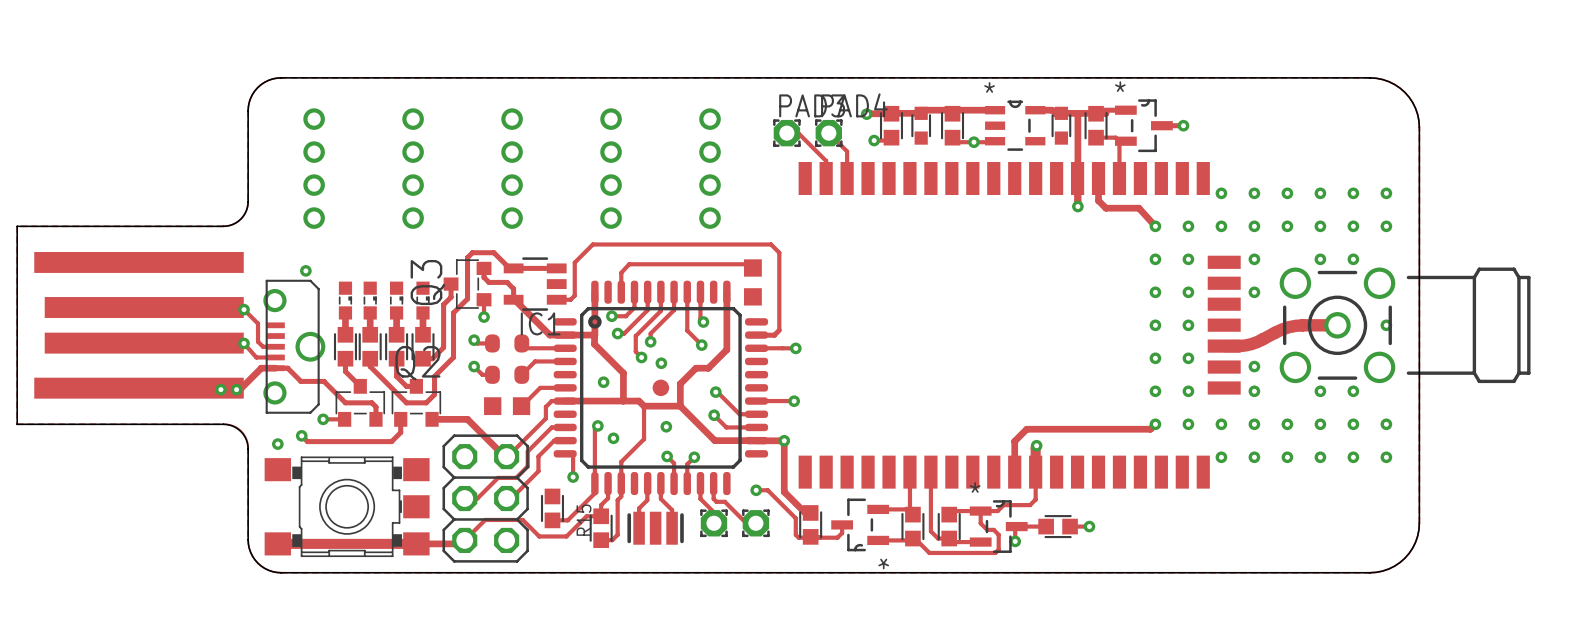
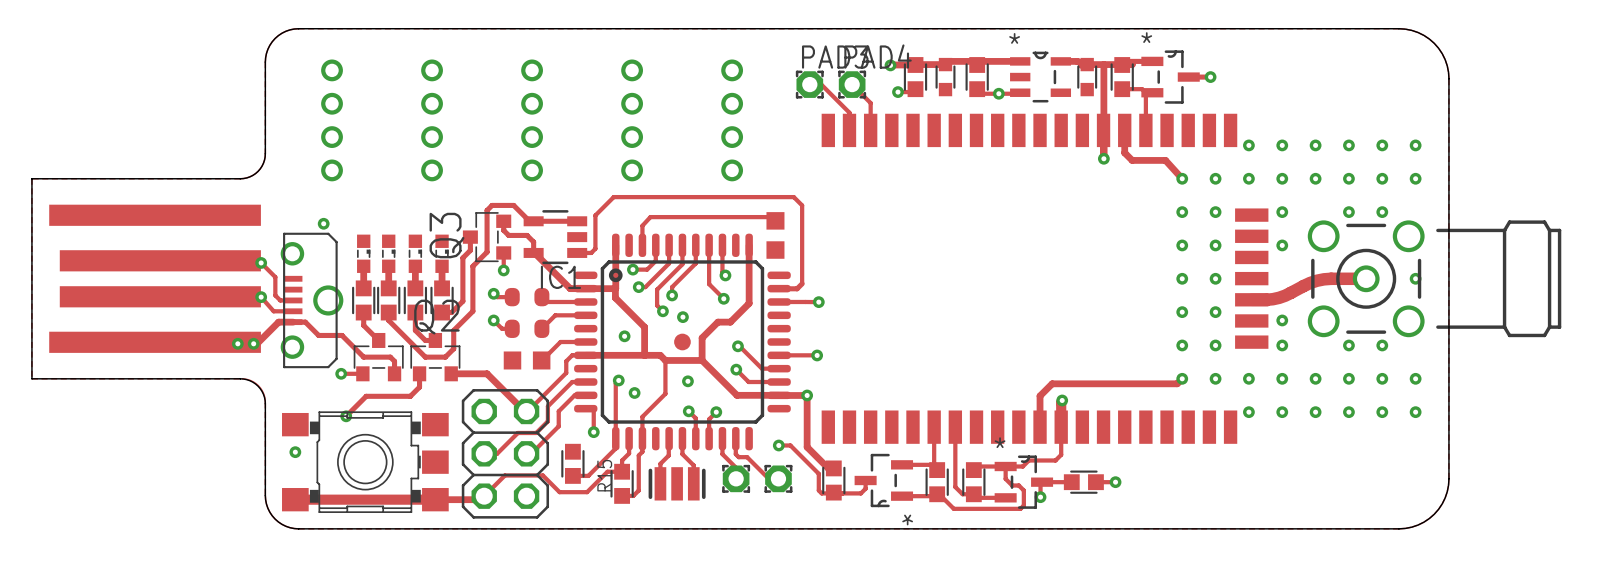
track: (301, 435) (307, 441) (347, 441) -> (346, 416) (366, 396)
via: (301, 435) -> none
via: (277, 444) -> none
via: none -> (346, 416)
via: none -> (295, 452)

